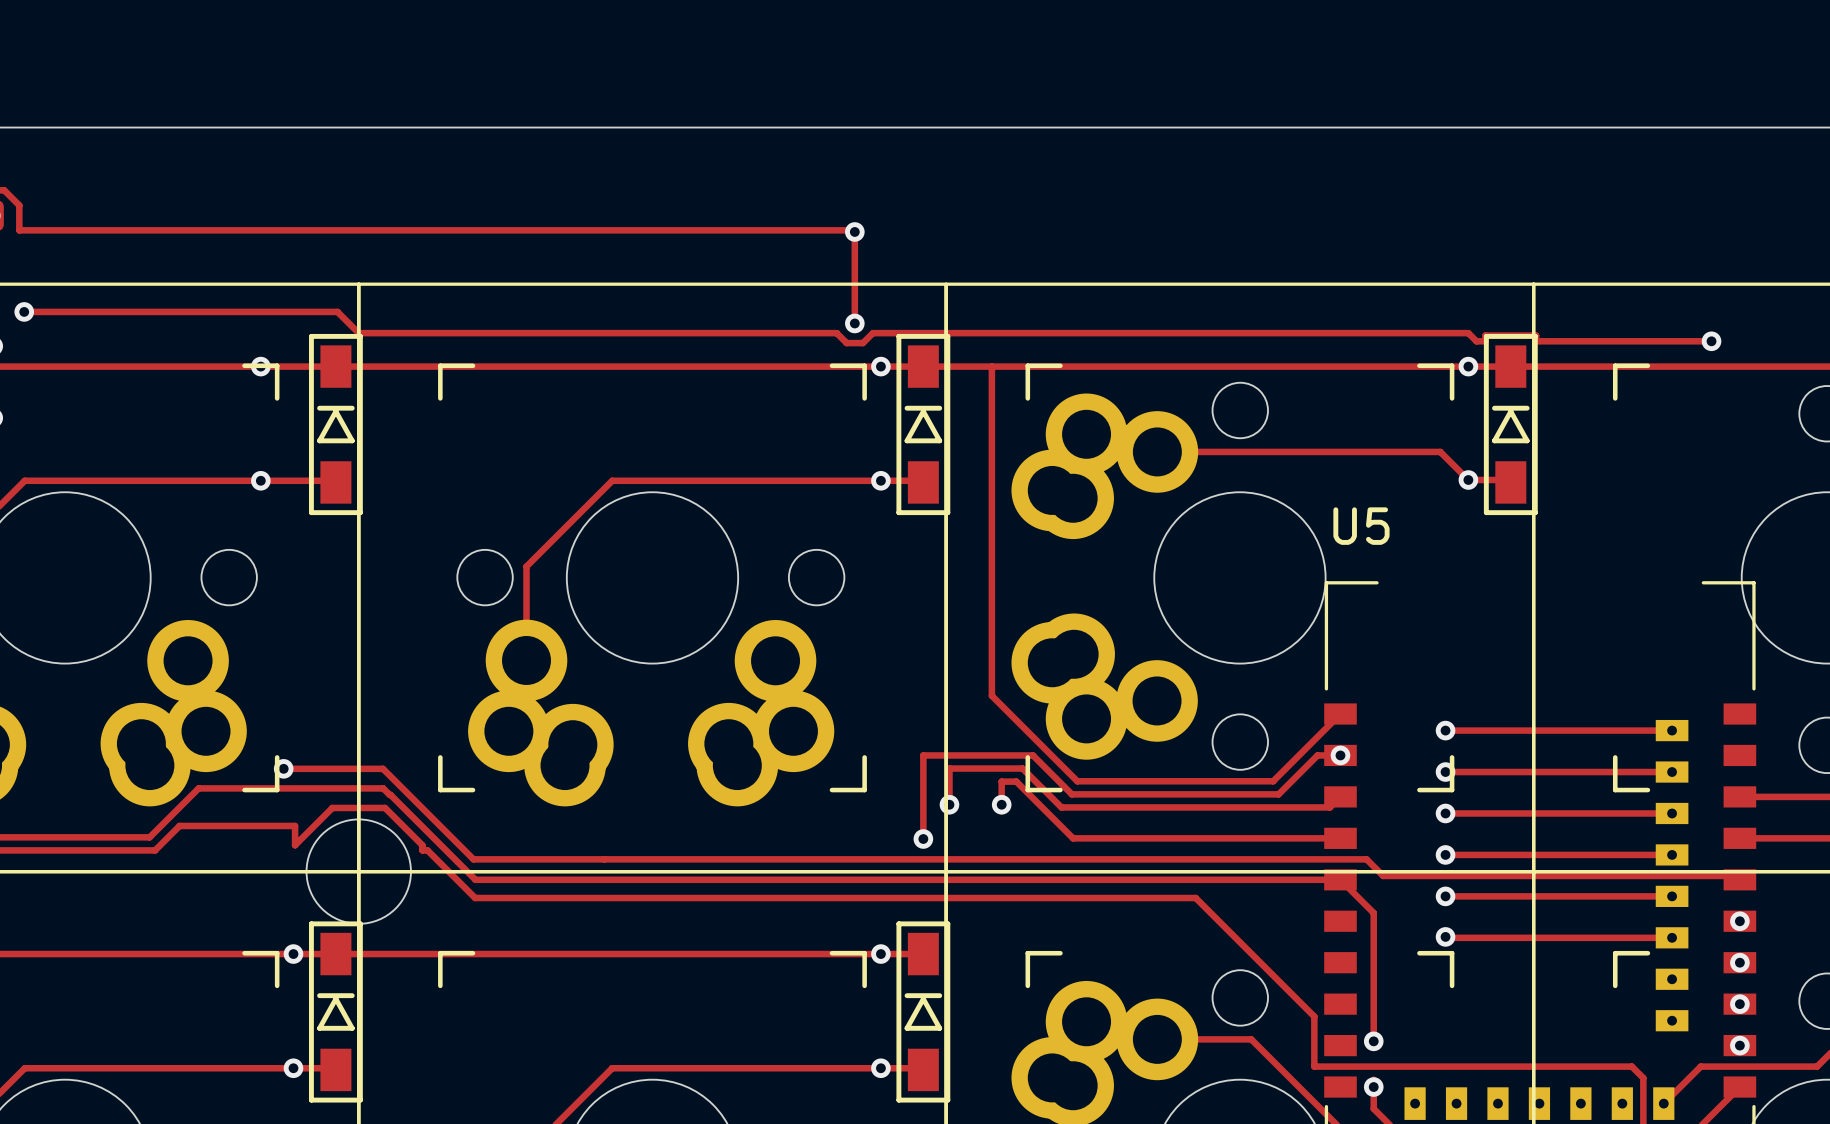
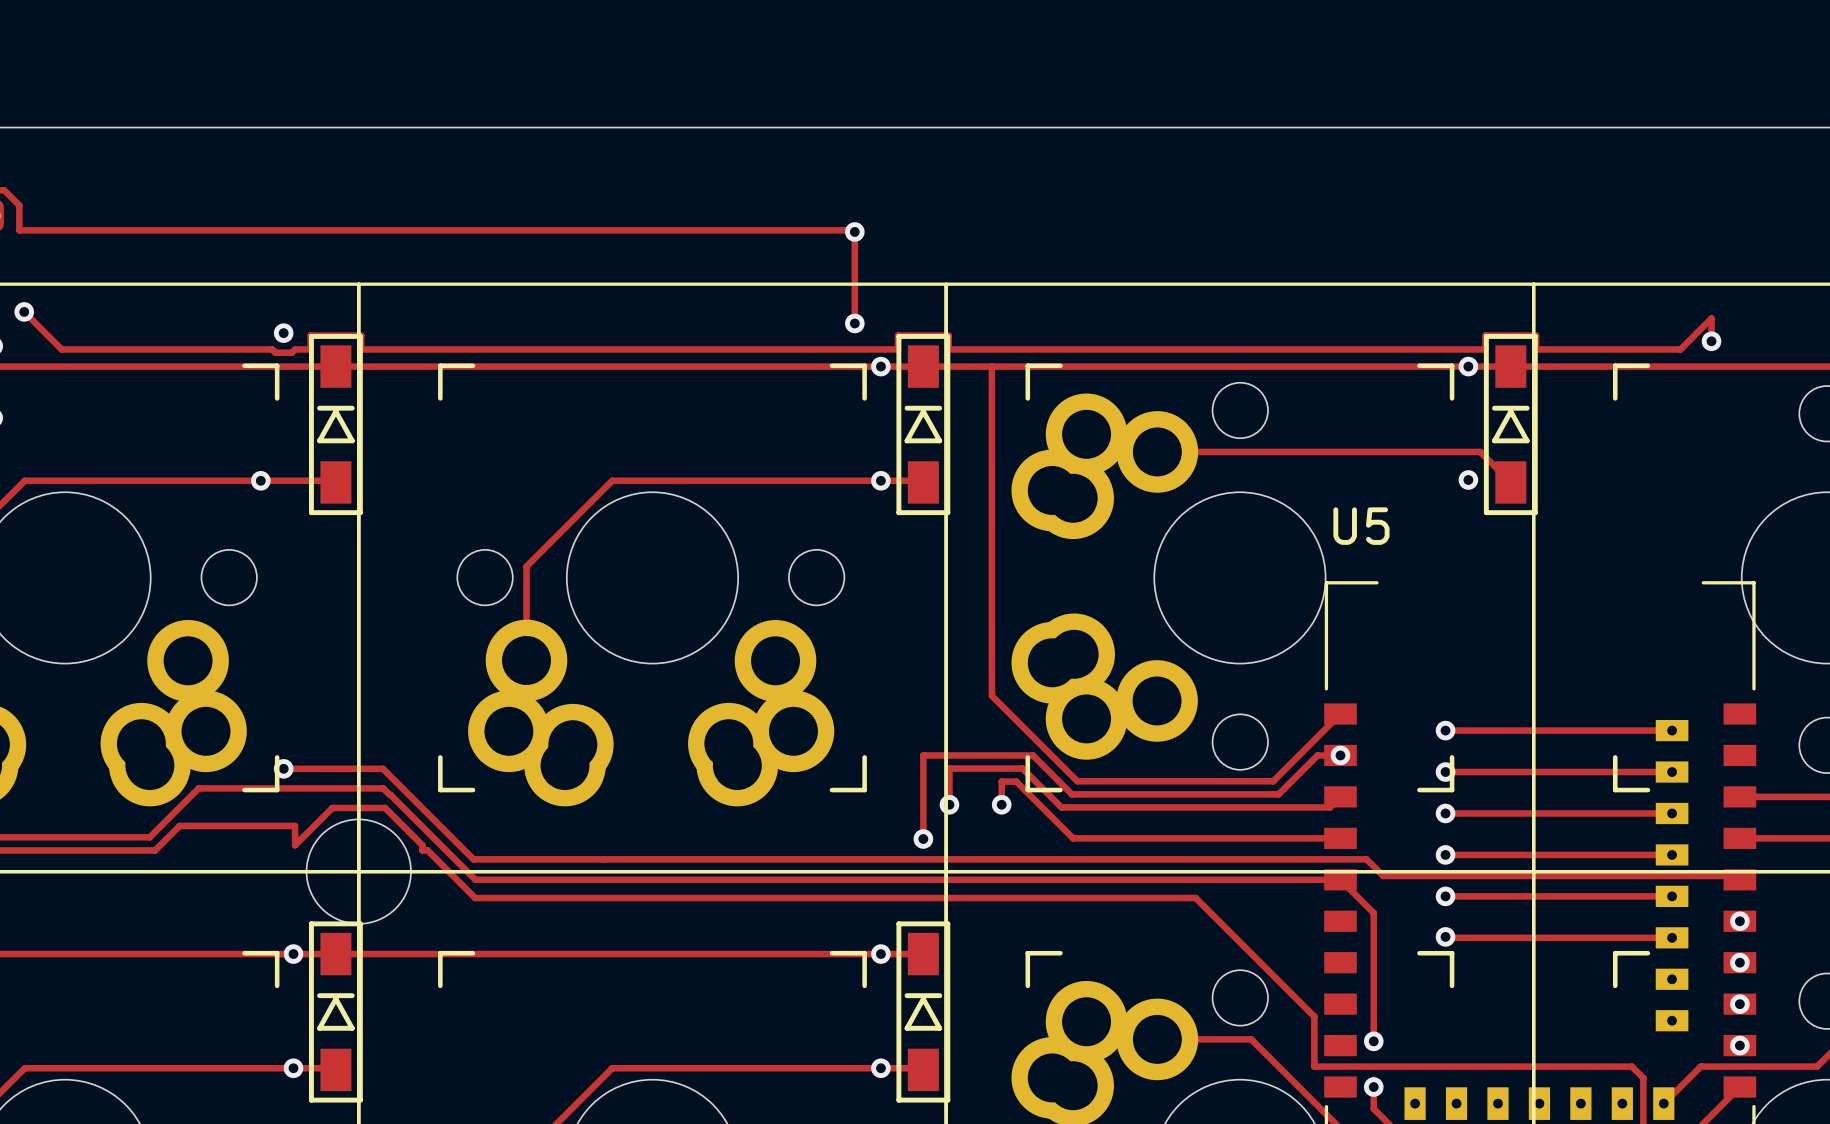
track: (24, 311) (337, 311) (358, 333) (836, 333) (846, 343) (862, 343) (872, 333) (1468, 333) (1476, 341) (1485, 341) -> (24, 311) (61, 349) (272, 349) (275, 352) (291, 352) (295, 349) (310, 349) (310, 335) (361, 335) (361, 349) (898, 349) (898, 335) (948, 335) (948, 349) (1485, 349) (1485, 341)
track: (1536, 341) (1711, 341) -> (1536, 341) (1536, 349) (1680, 349) (1711, 318) (1711, 341)
via position: (260, 366) -> (283, 333)
track: (1440, 451) (1468, 480) (1508, 480) -> (1440, 451) (1480, 451) (1508, 480)

